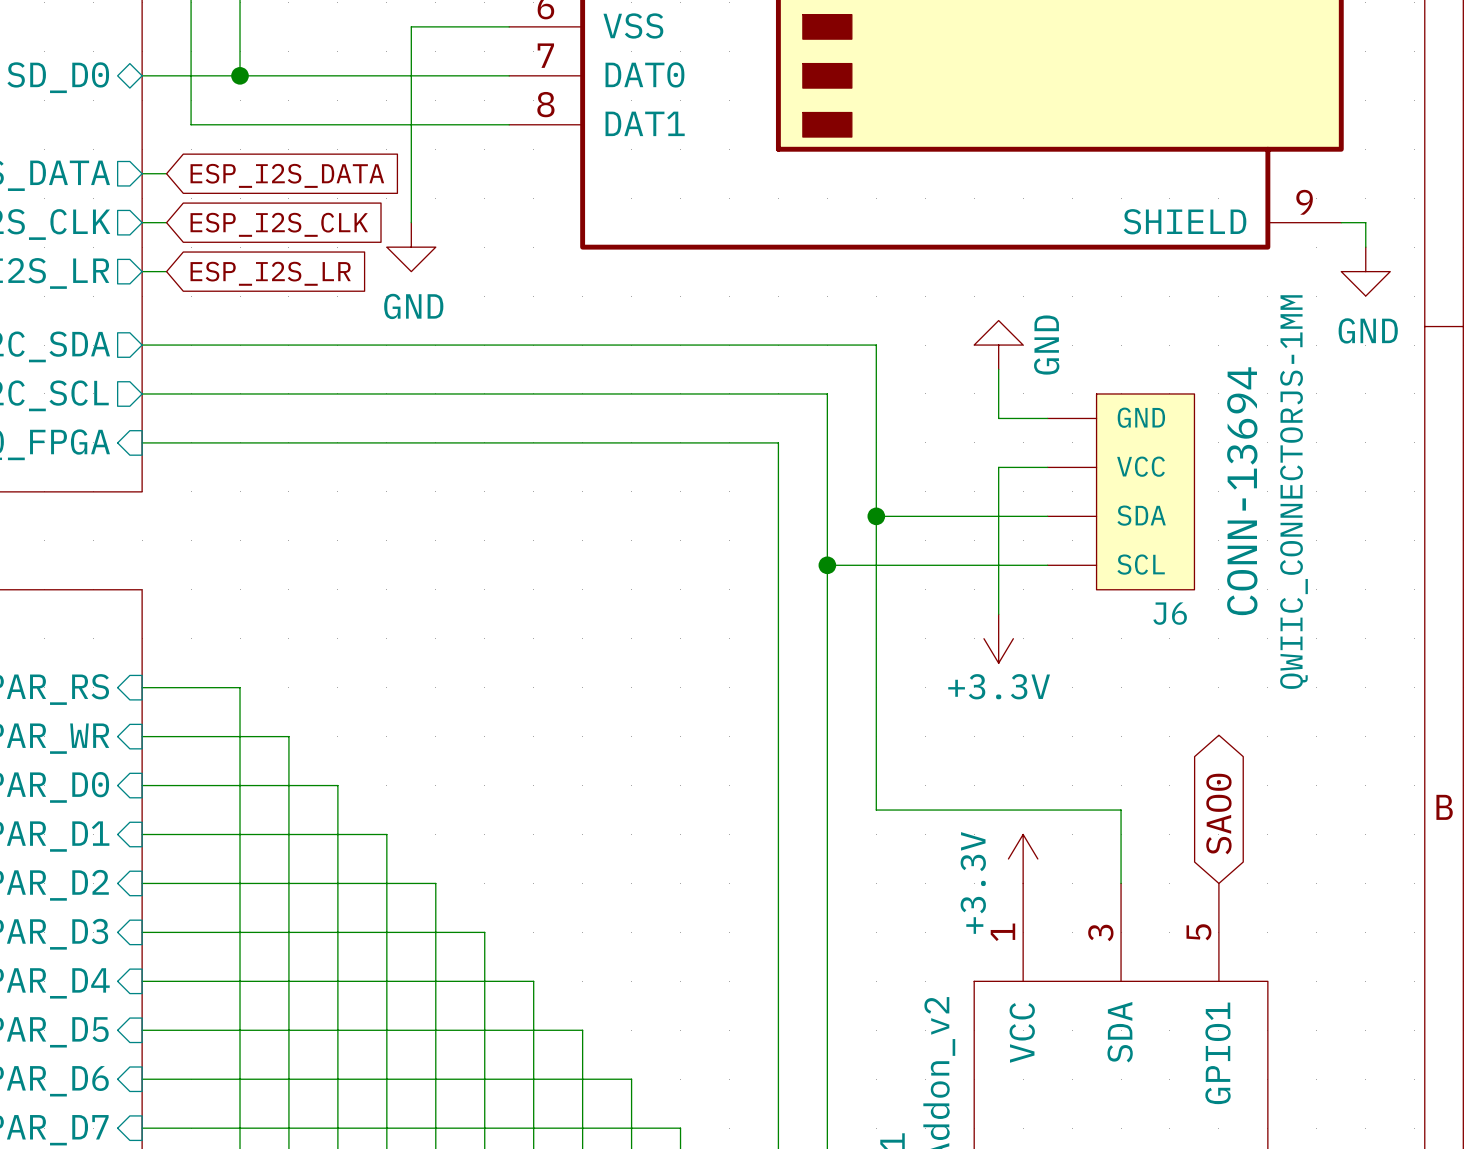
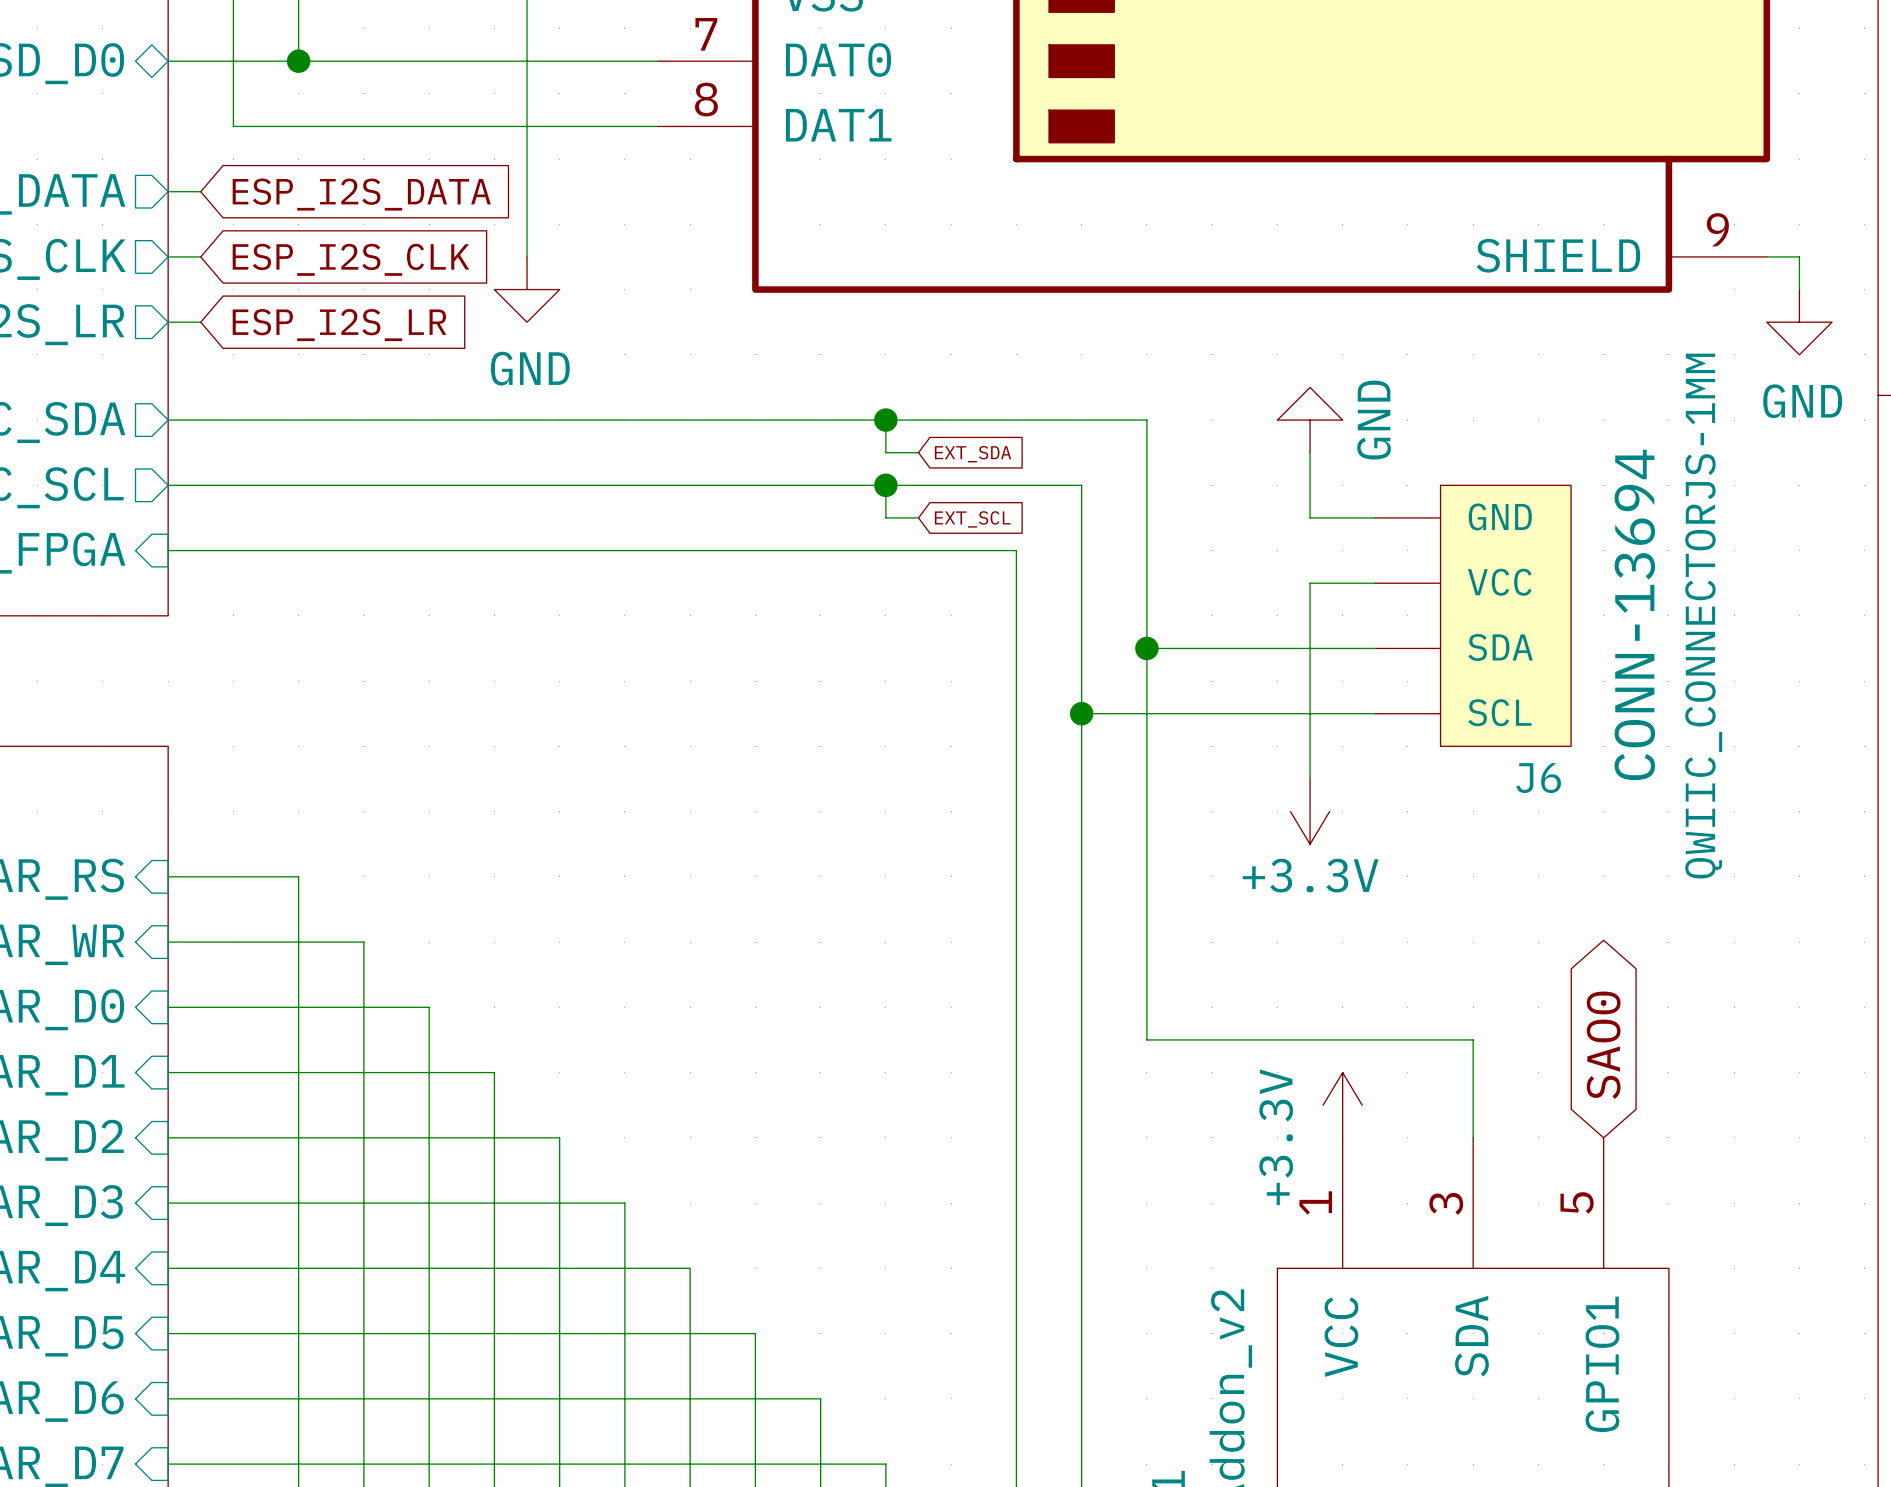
wire: none -> (885, 420) (885, 452) (918, 452)
junction: none -> (885, 420)
global label: none -> EXT_SDA (973, 454)
wire: none -> (885, 485) (885, 517) (918, 517)
junction: none -> (885, 485)
global label: none -> EXT_SCL (972, 519)

